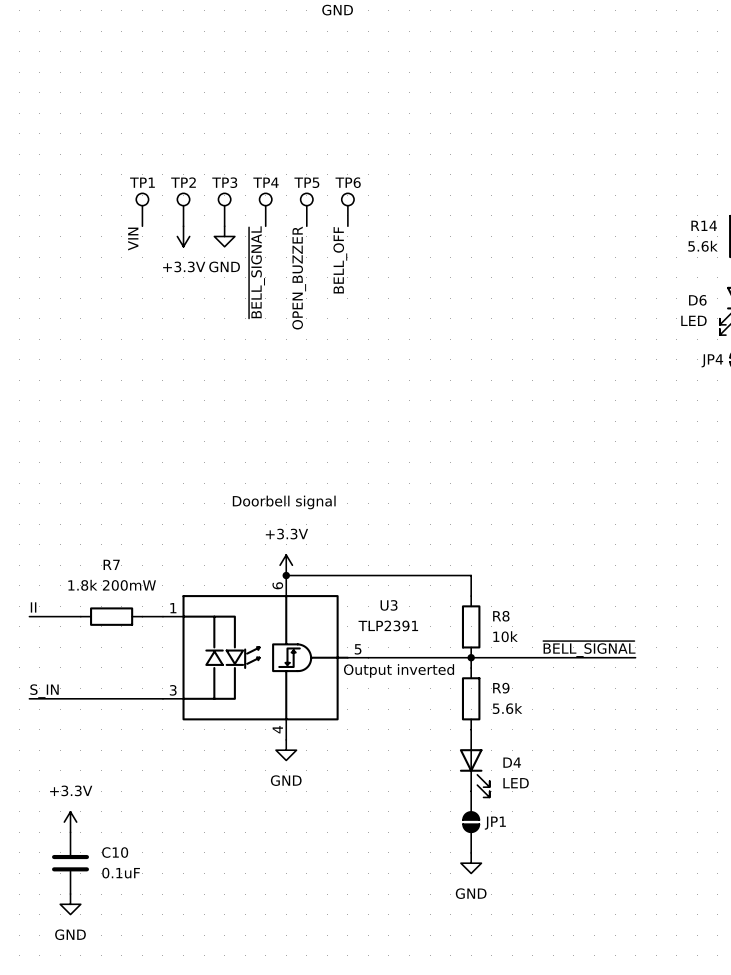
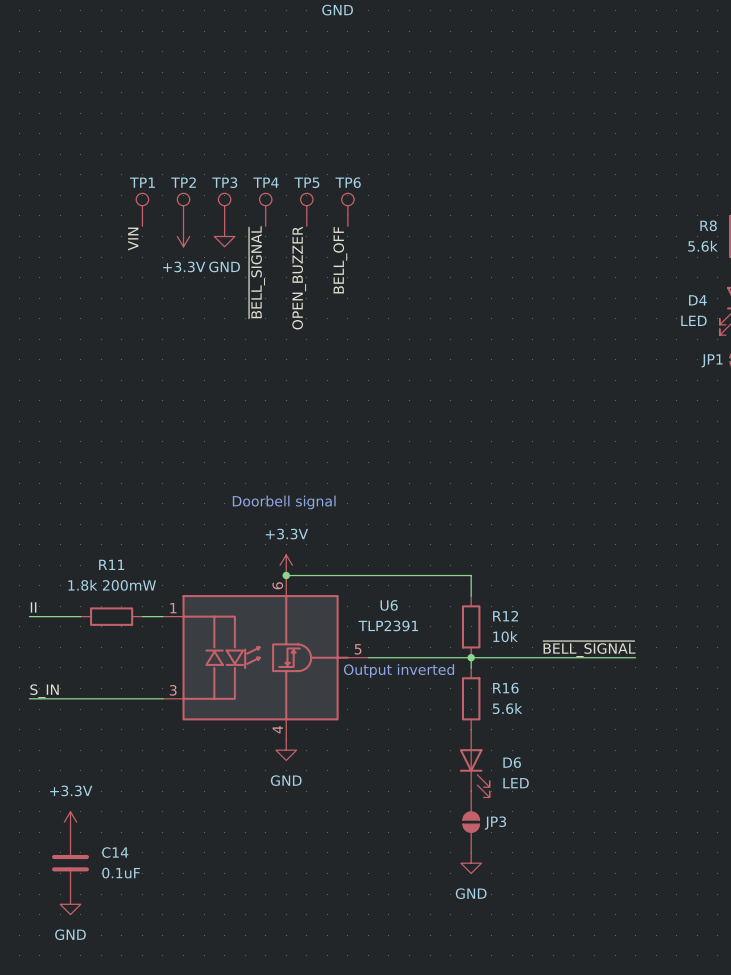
R14 name: R14 (704, 225) -> R8 (708, 225)
D6 name: D6 (697, 300) -> D4 (697, 300)
JP4 name: JP4 (712, 360) -> JP1 (712, 360)
R7 name: R7 (111, 564) -> R11 (111, 564)
U3 name: U3 (389, 605) -> U6 (389, 605)
R8 name: R8 (501, 616) -> R12 (505, 616)
R9 name: R9 (501, 688) -> R16 (505, 688)
D4 name: D4 (512, 762) -> D6 (512, 762)
JP1 name: JP1 (495, 823) -> JP3 (495, 823)
C10 name: C10 (115, 852) -> C14 (115, 852)

